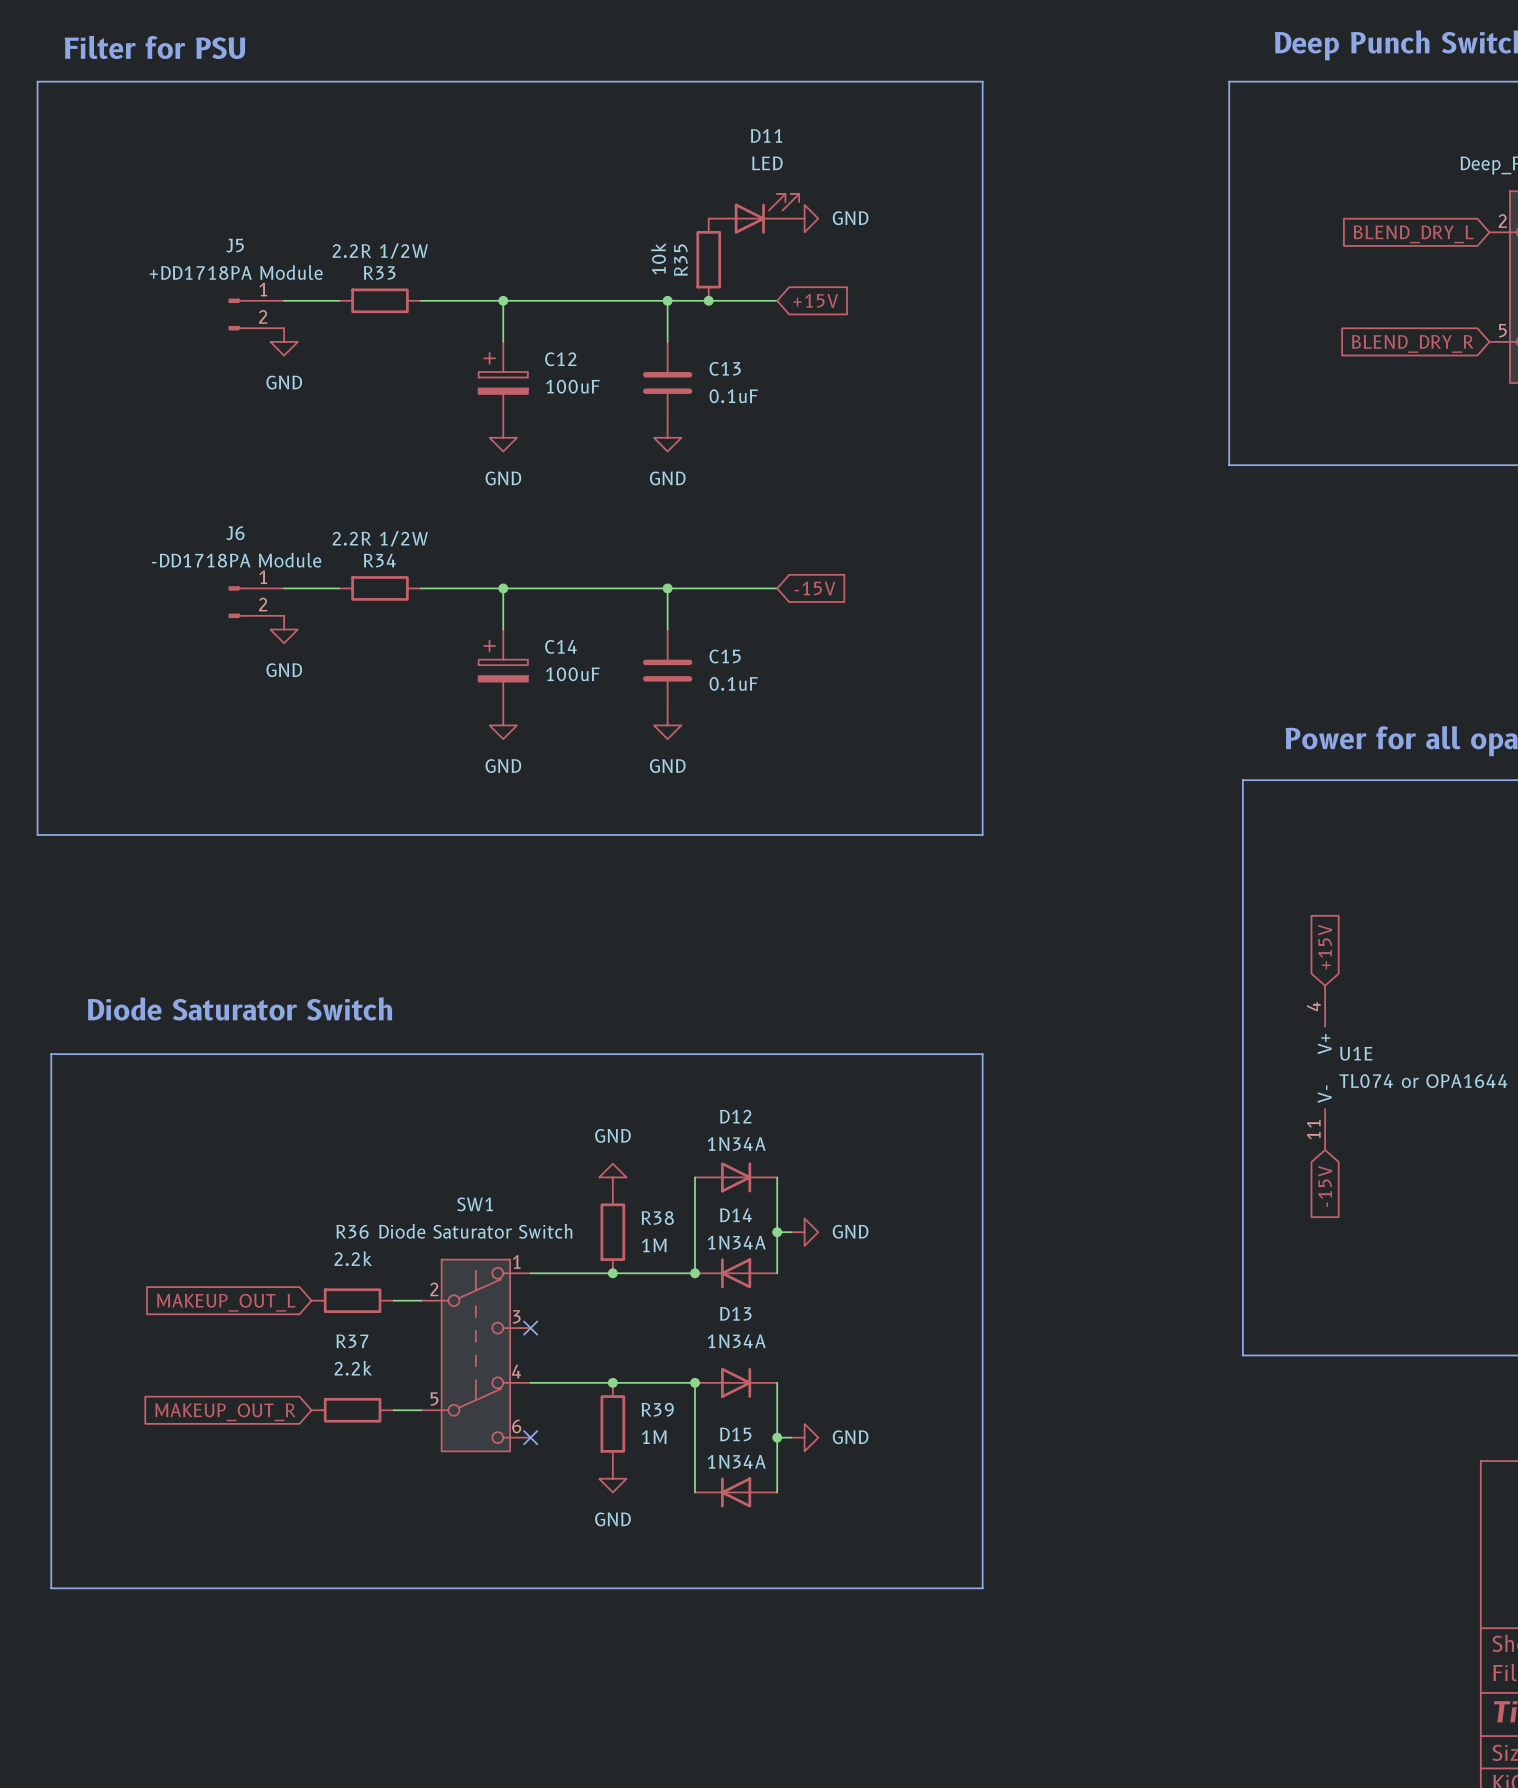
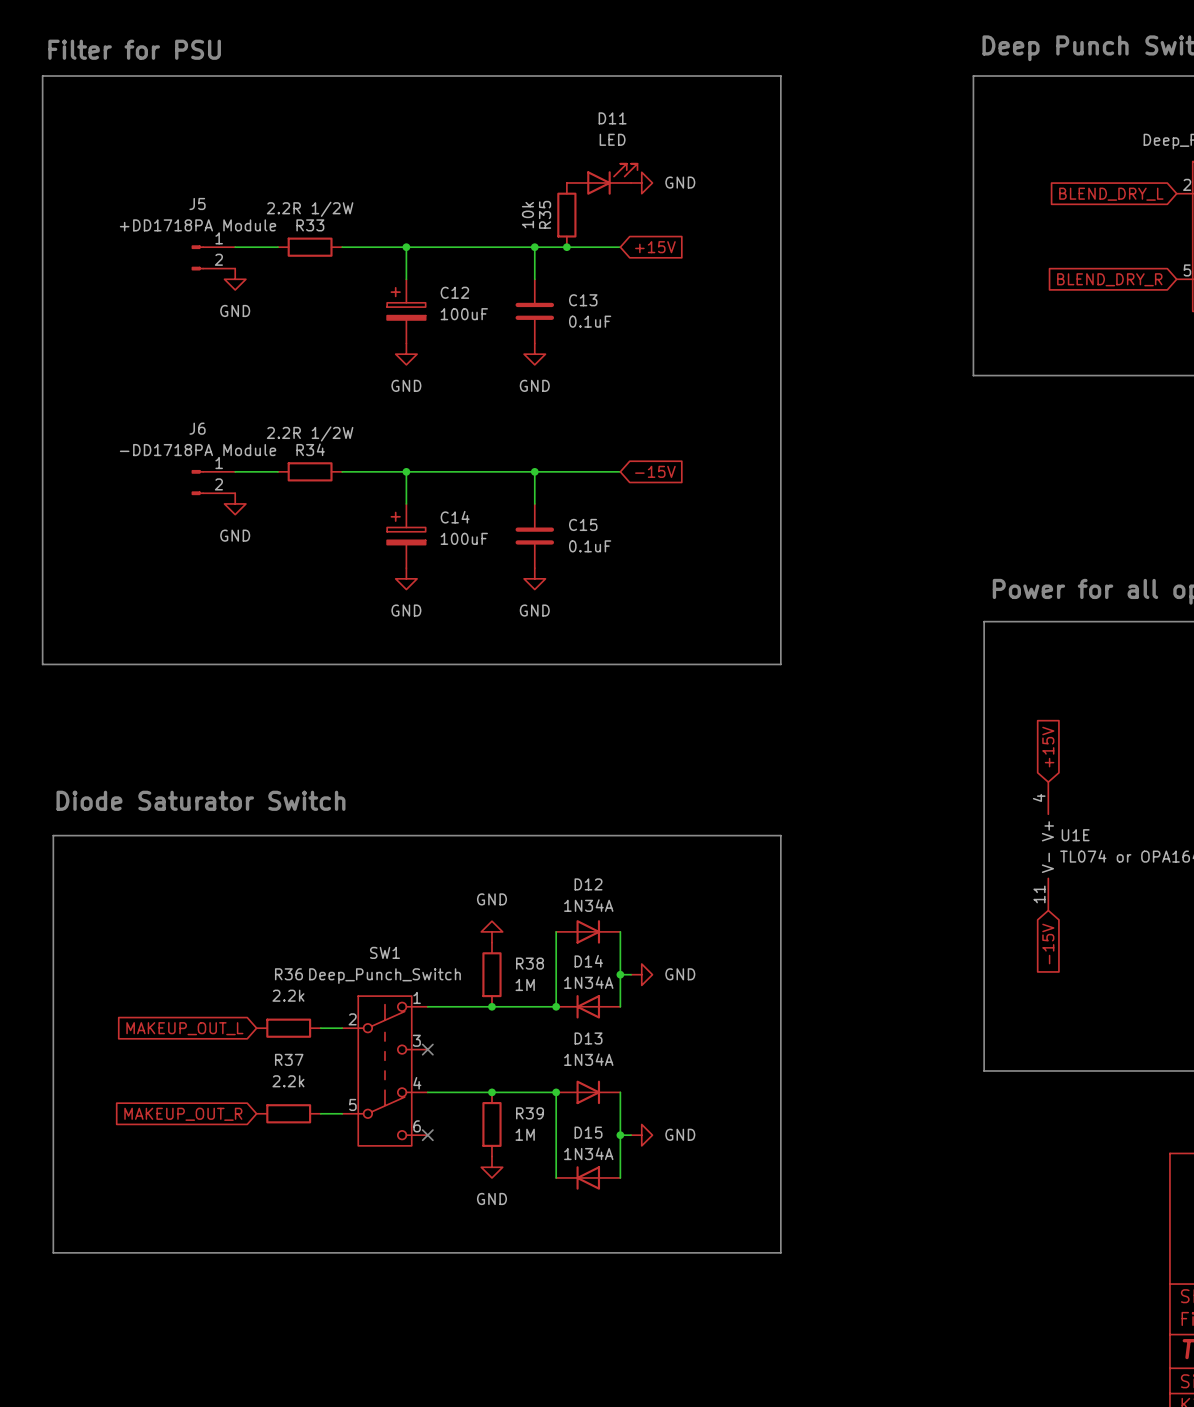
SW1 value: Diode Saturator Switch (475, 1231) -> Deep_Punch_Switch (384, 976)

